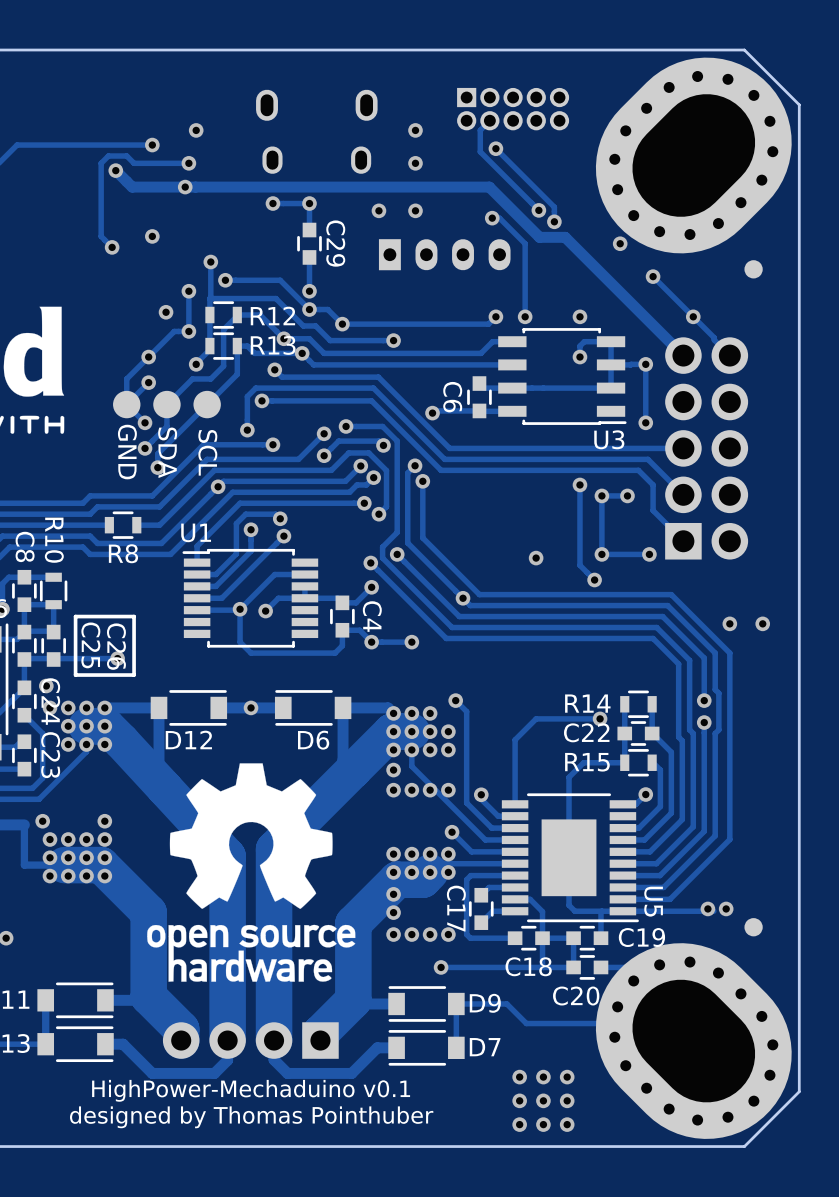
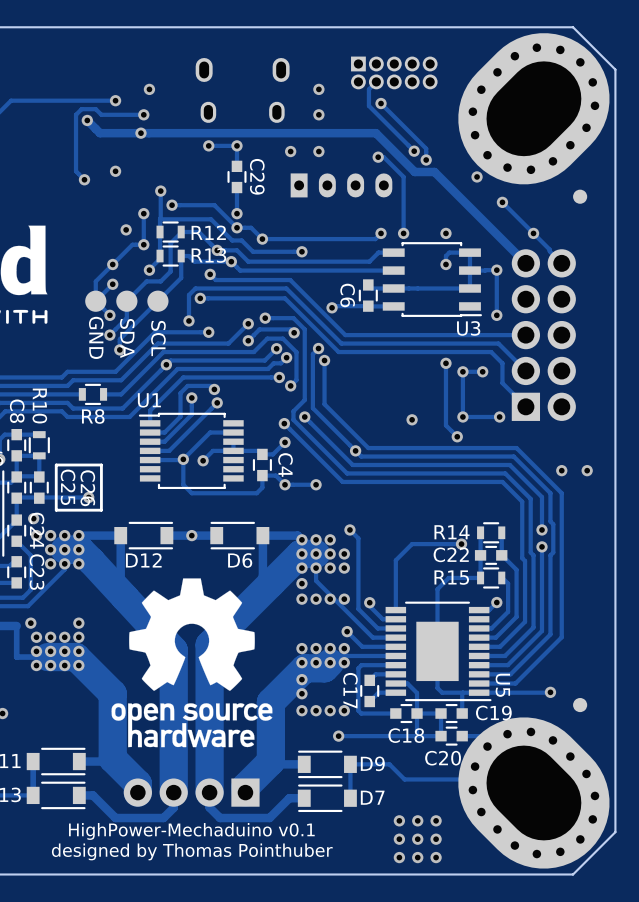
via: (707, 908) -> none
via: (726, 908) -> none
via: none -> (550, 692)

